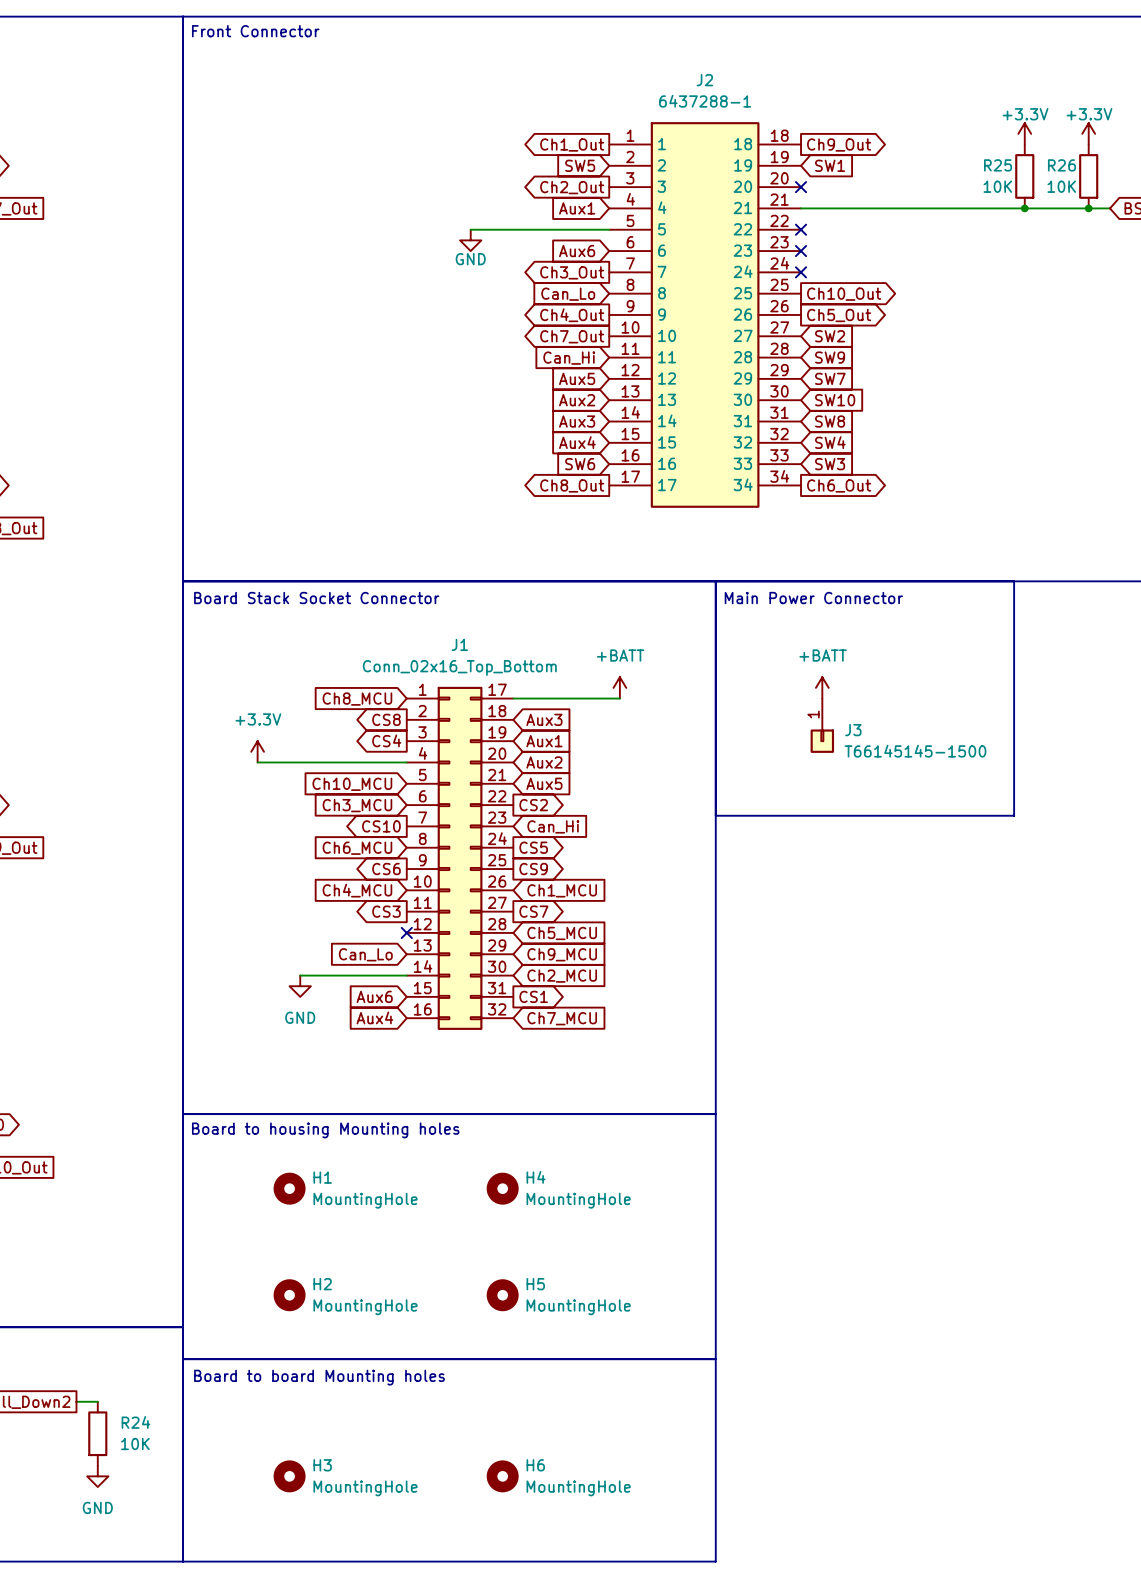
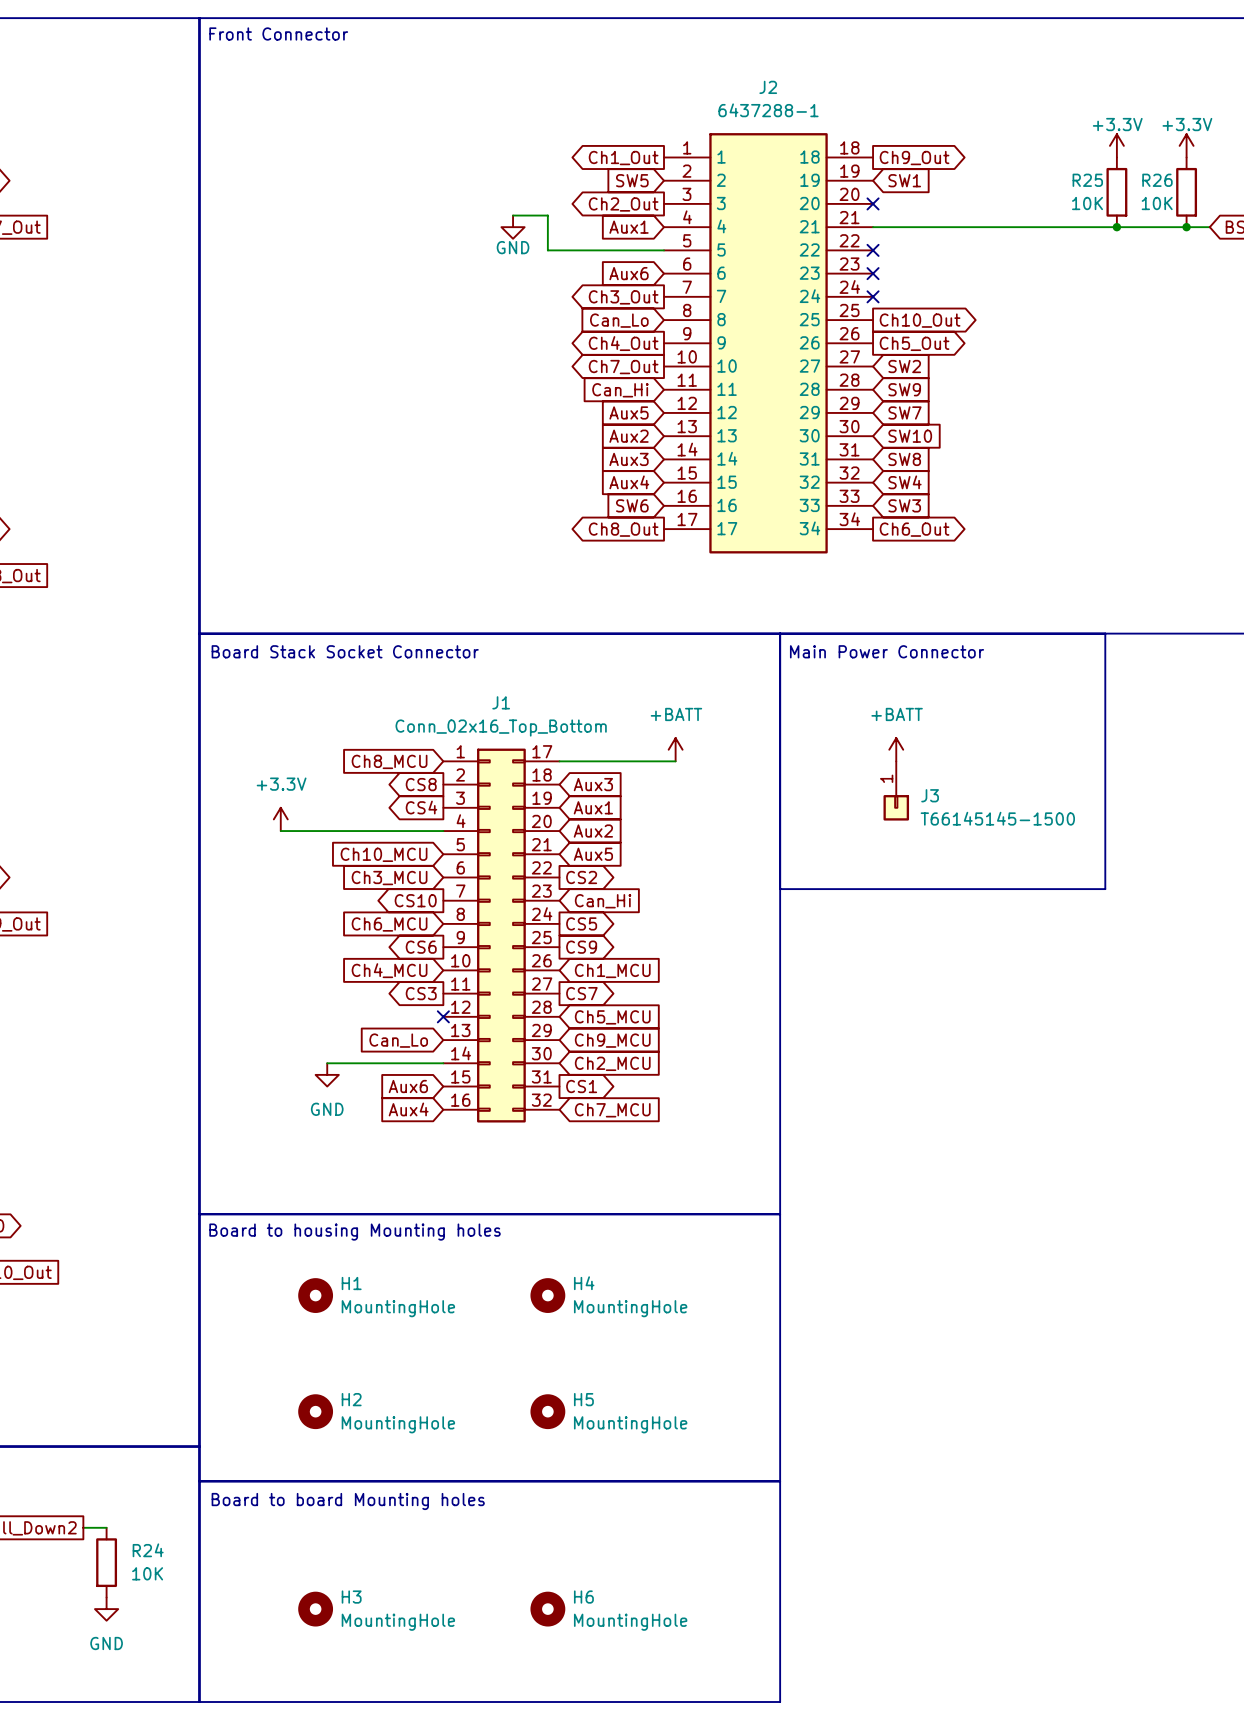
wire: (470, 229) (502, 229) -> (513, 215) (547, 215) (547, 250)
power symbol position: GND (470, 240) -> GND (513, 227)

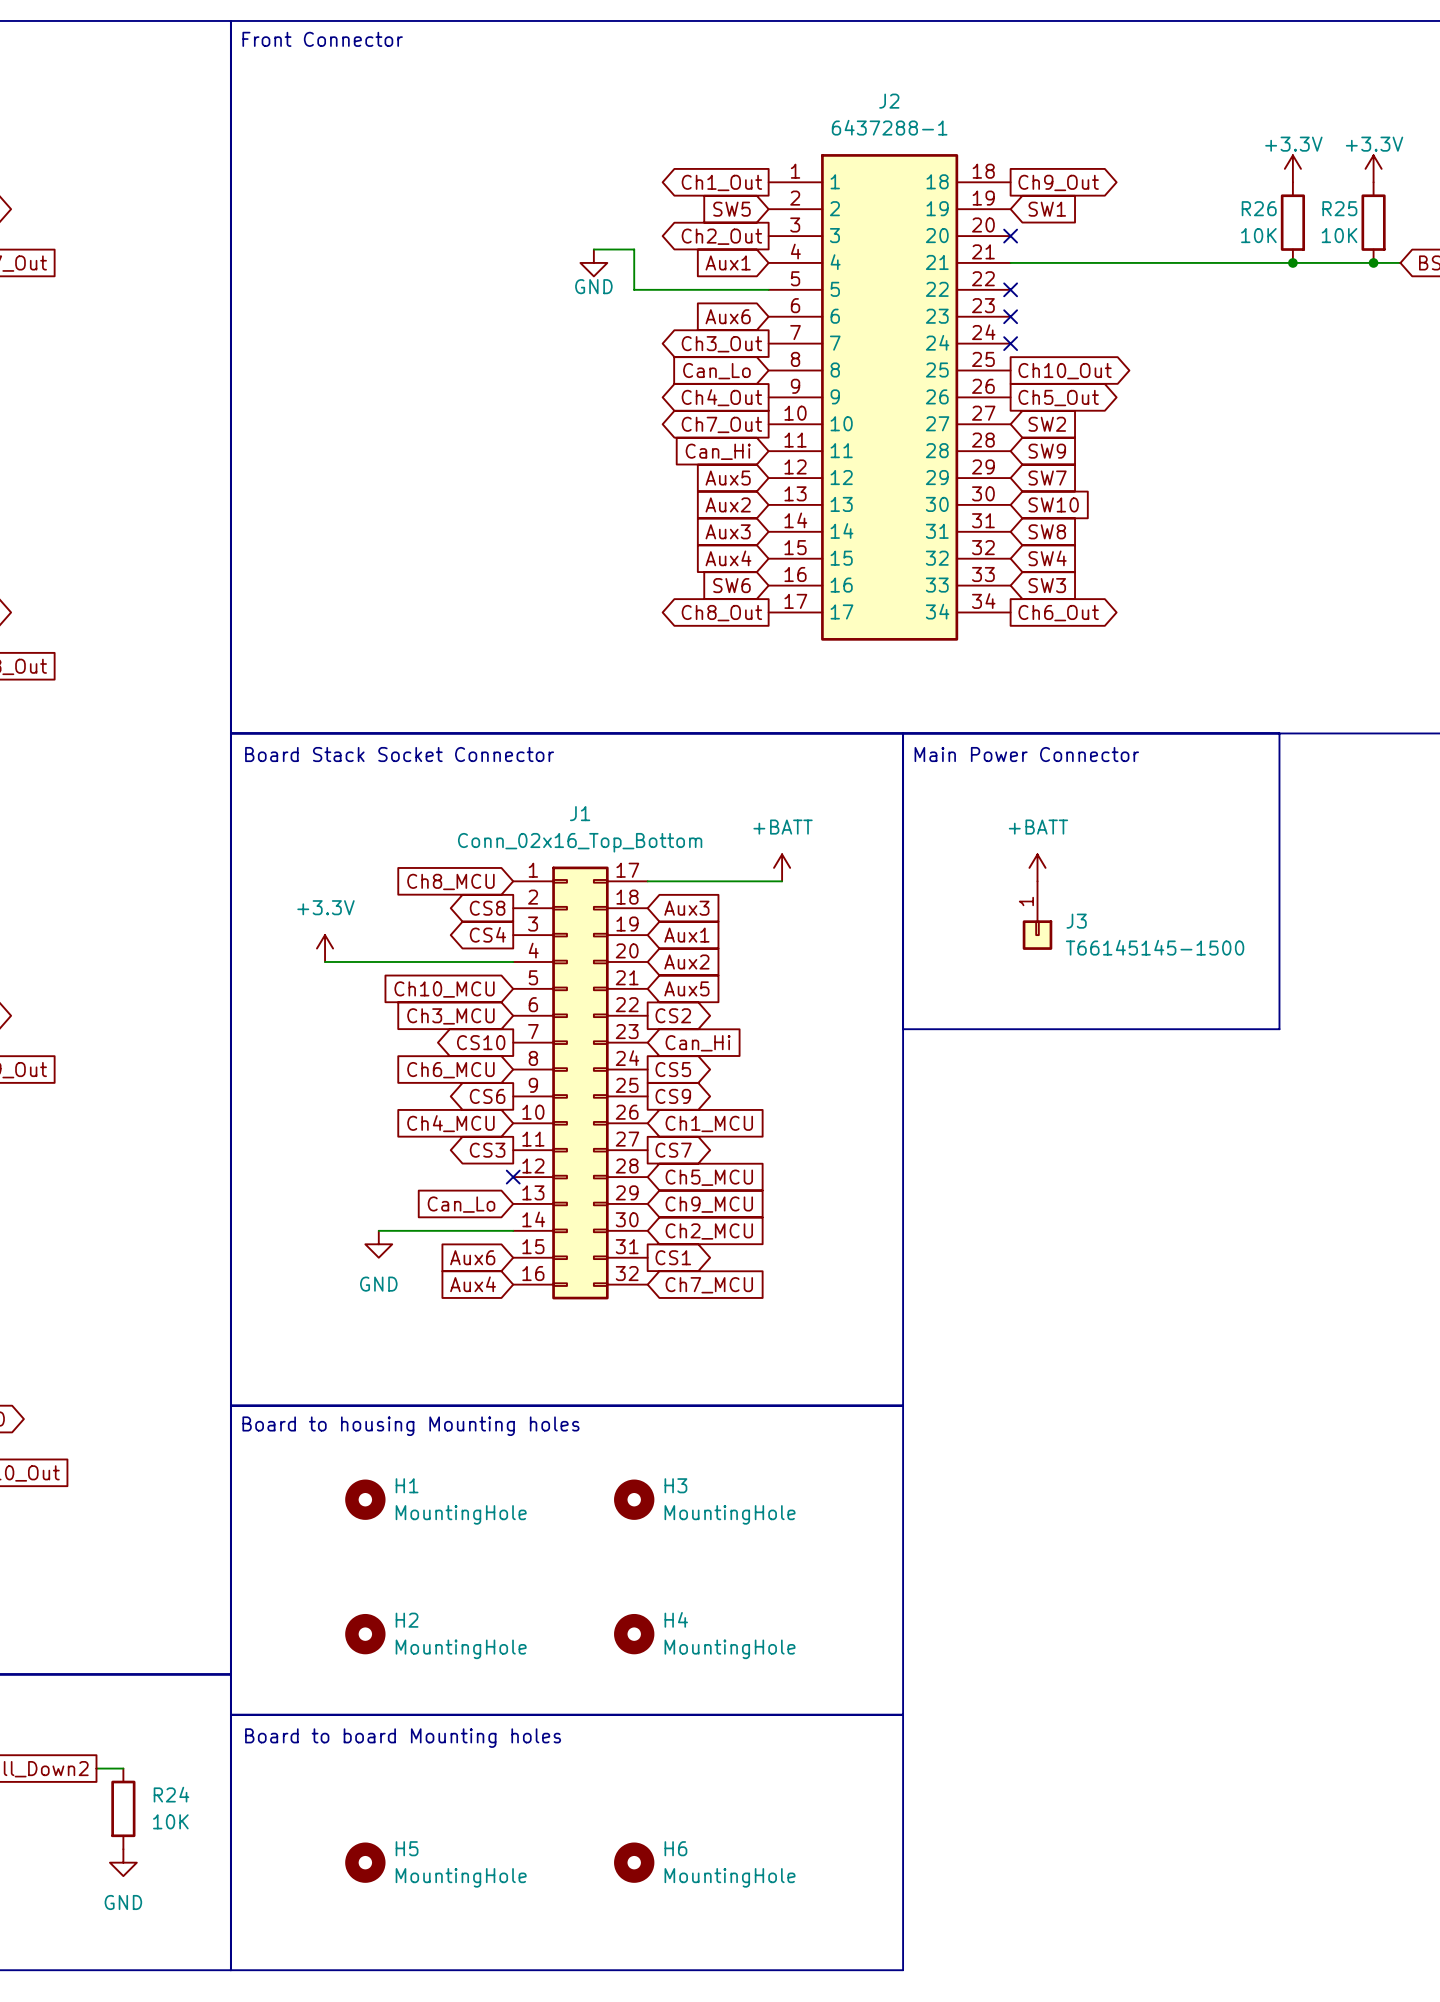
R25 name: R25 (1087, 180) -> R26 (1259, 208)
R26 name: R26 (1157, 180) -> R25 (1339, 208)
H4 name: H4 (584, 1283) -> H3 (675, 1485)
H5 name: H5 (583, 1399) -> H4 (676, 1619)
H3 name: H3 (351, 1597) -> H5 (407, 1848)

